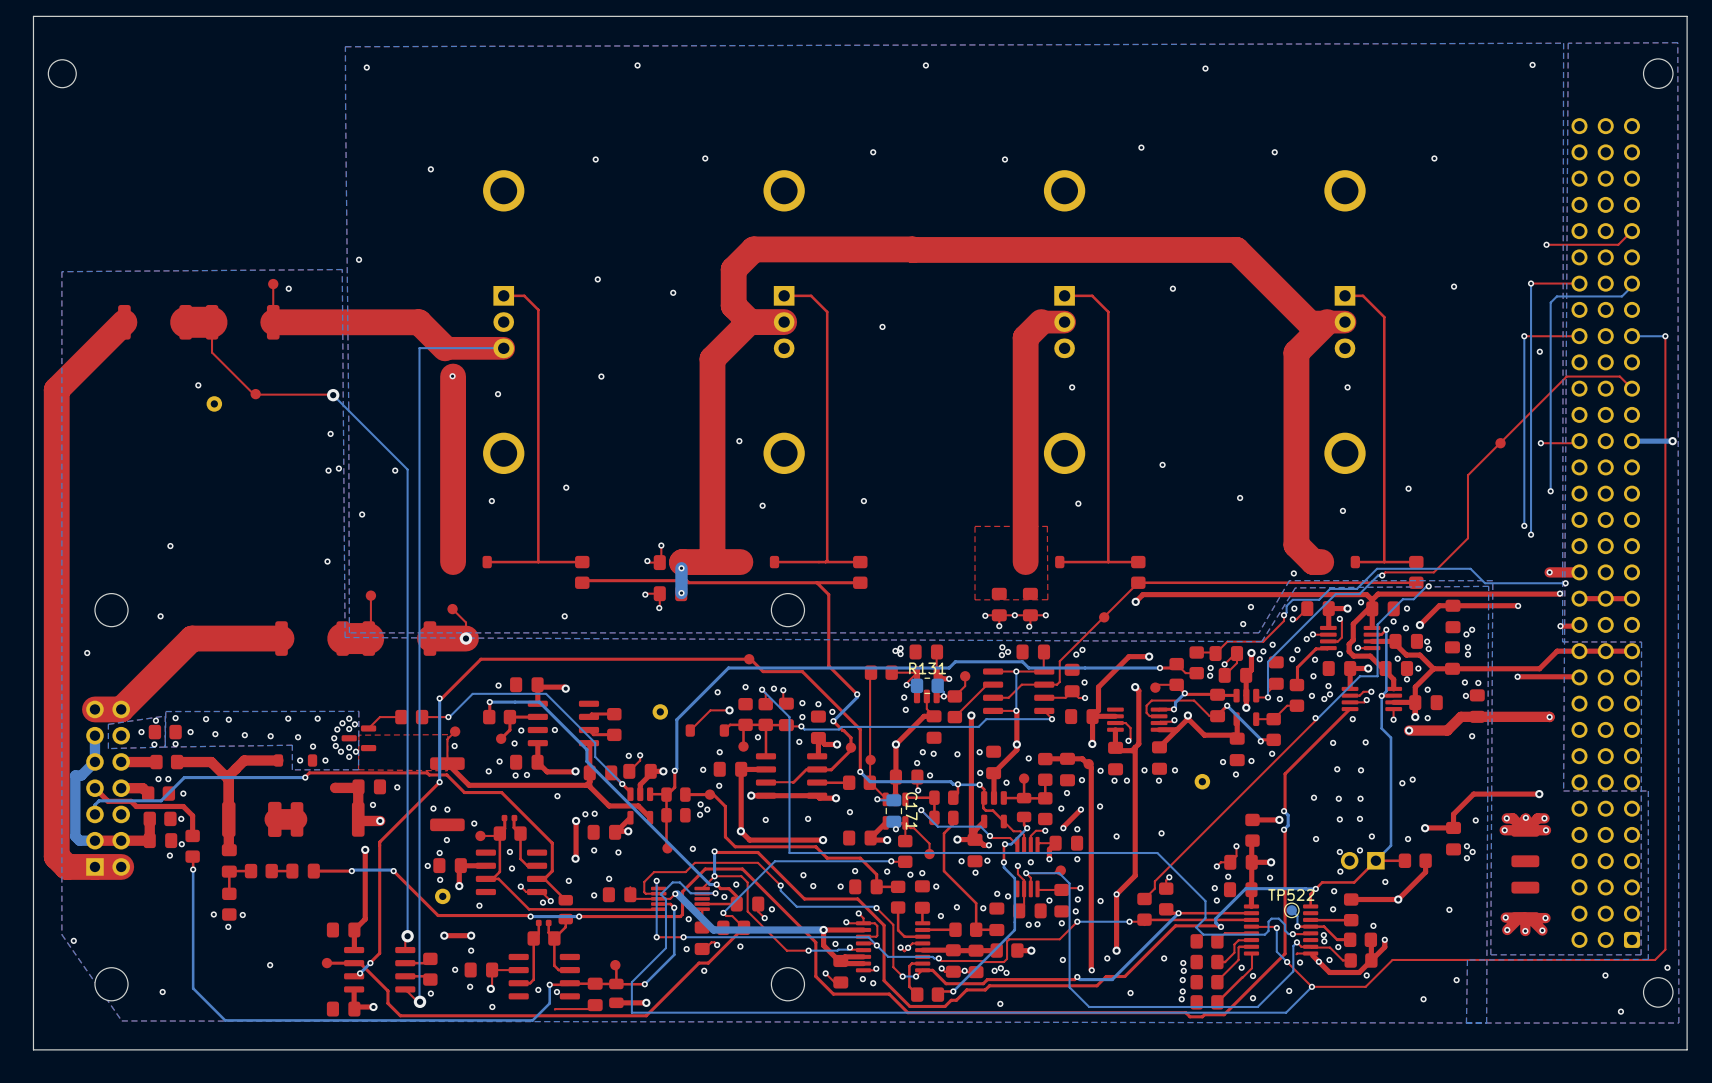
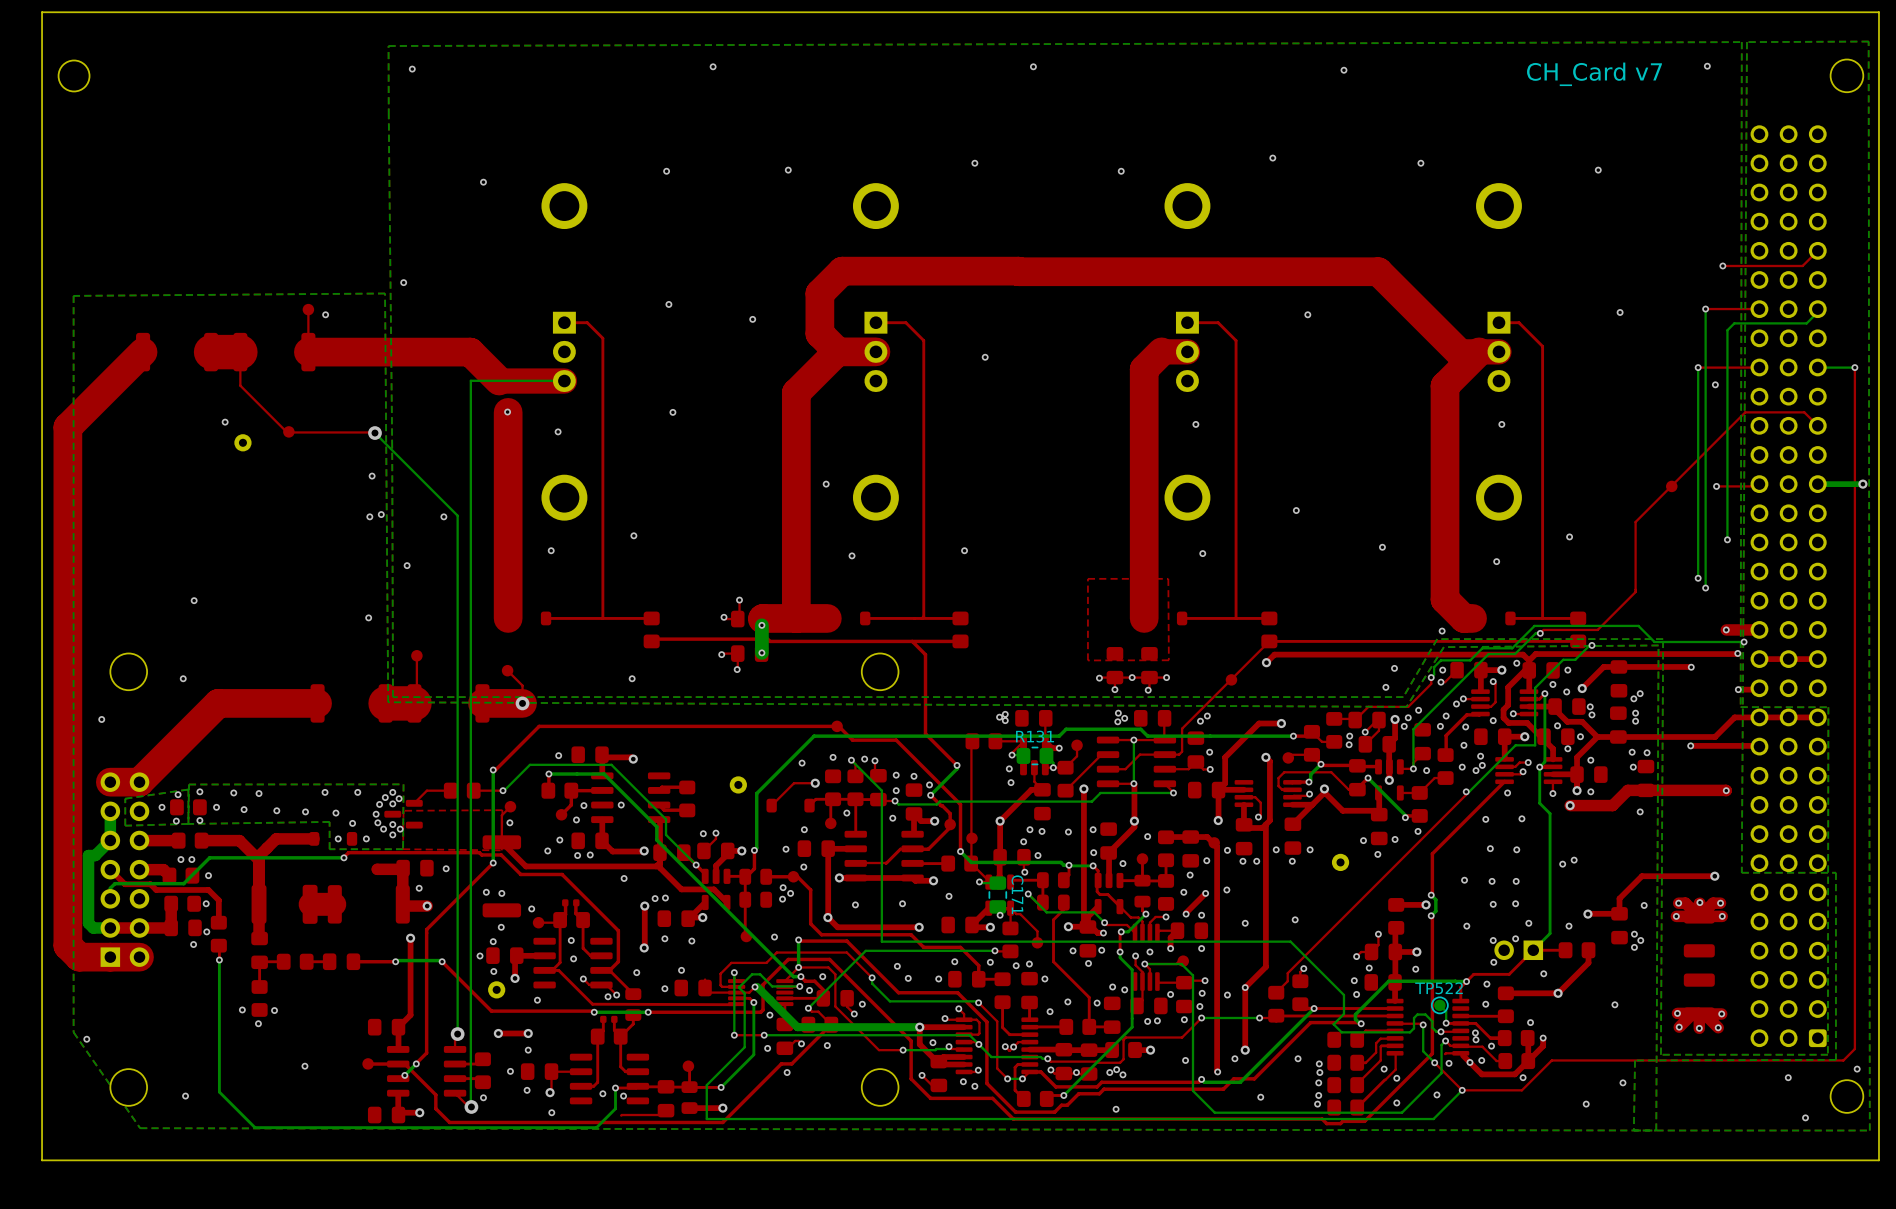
text: none -> CH_Card v7 (1594, 74)

